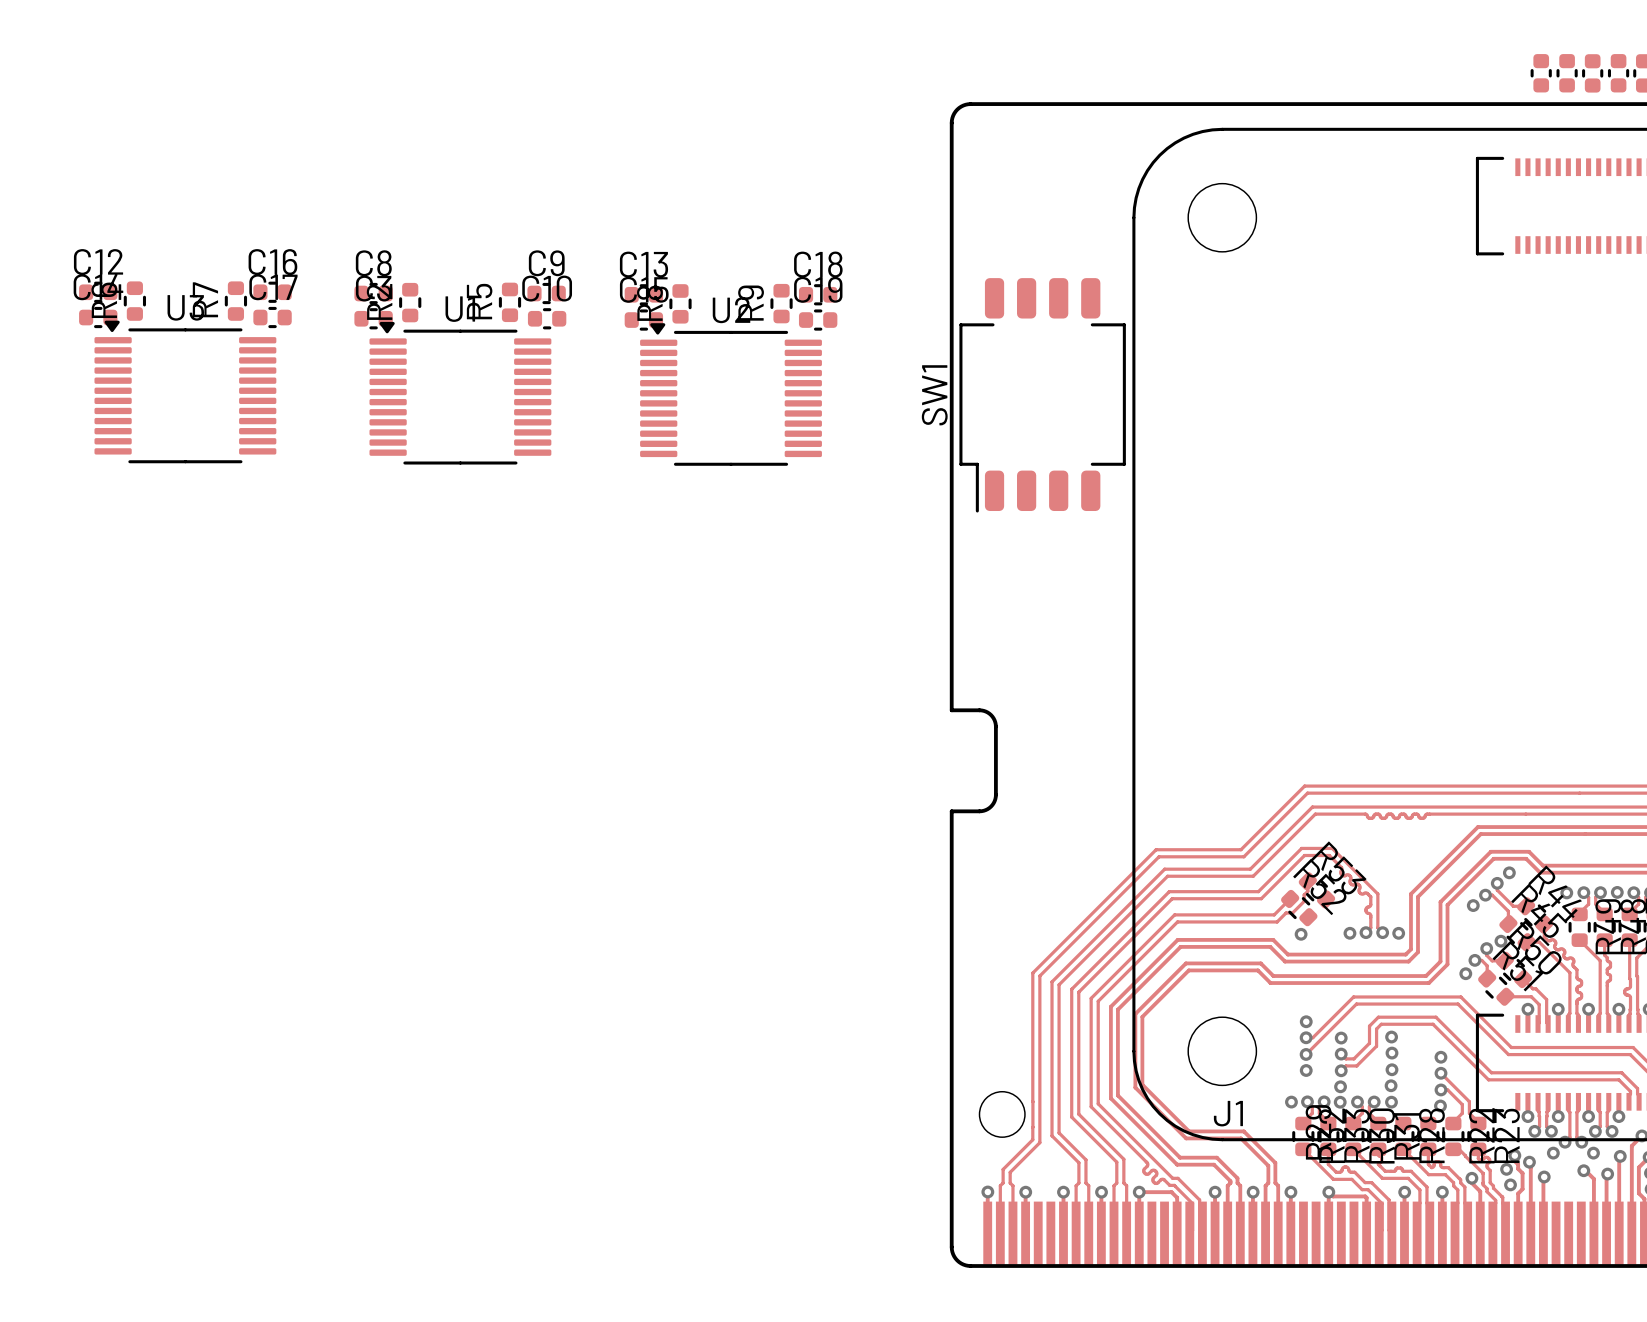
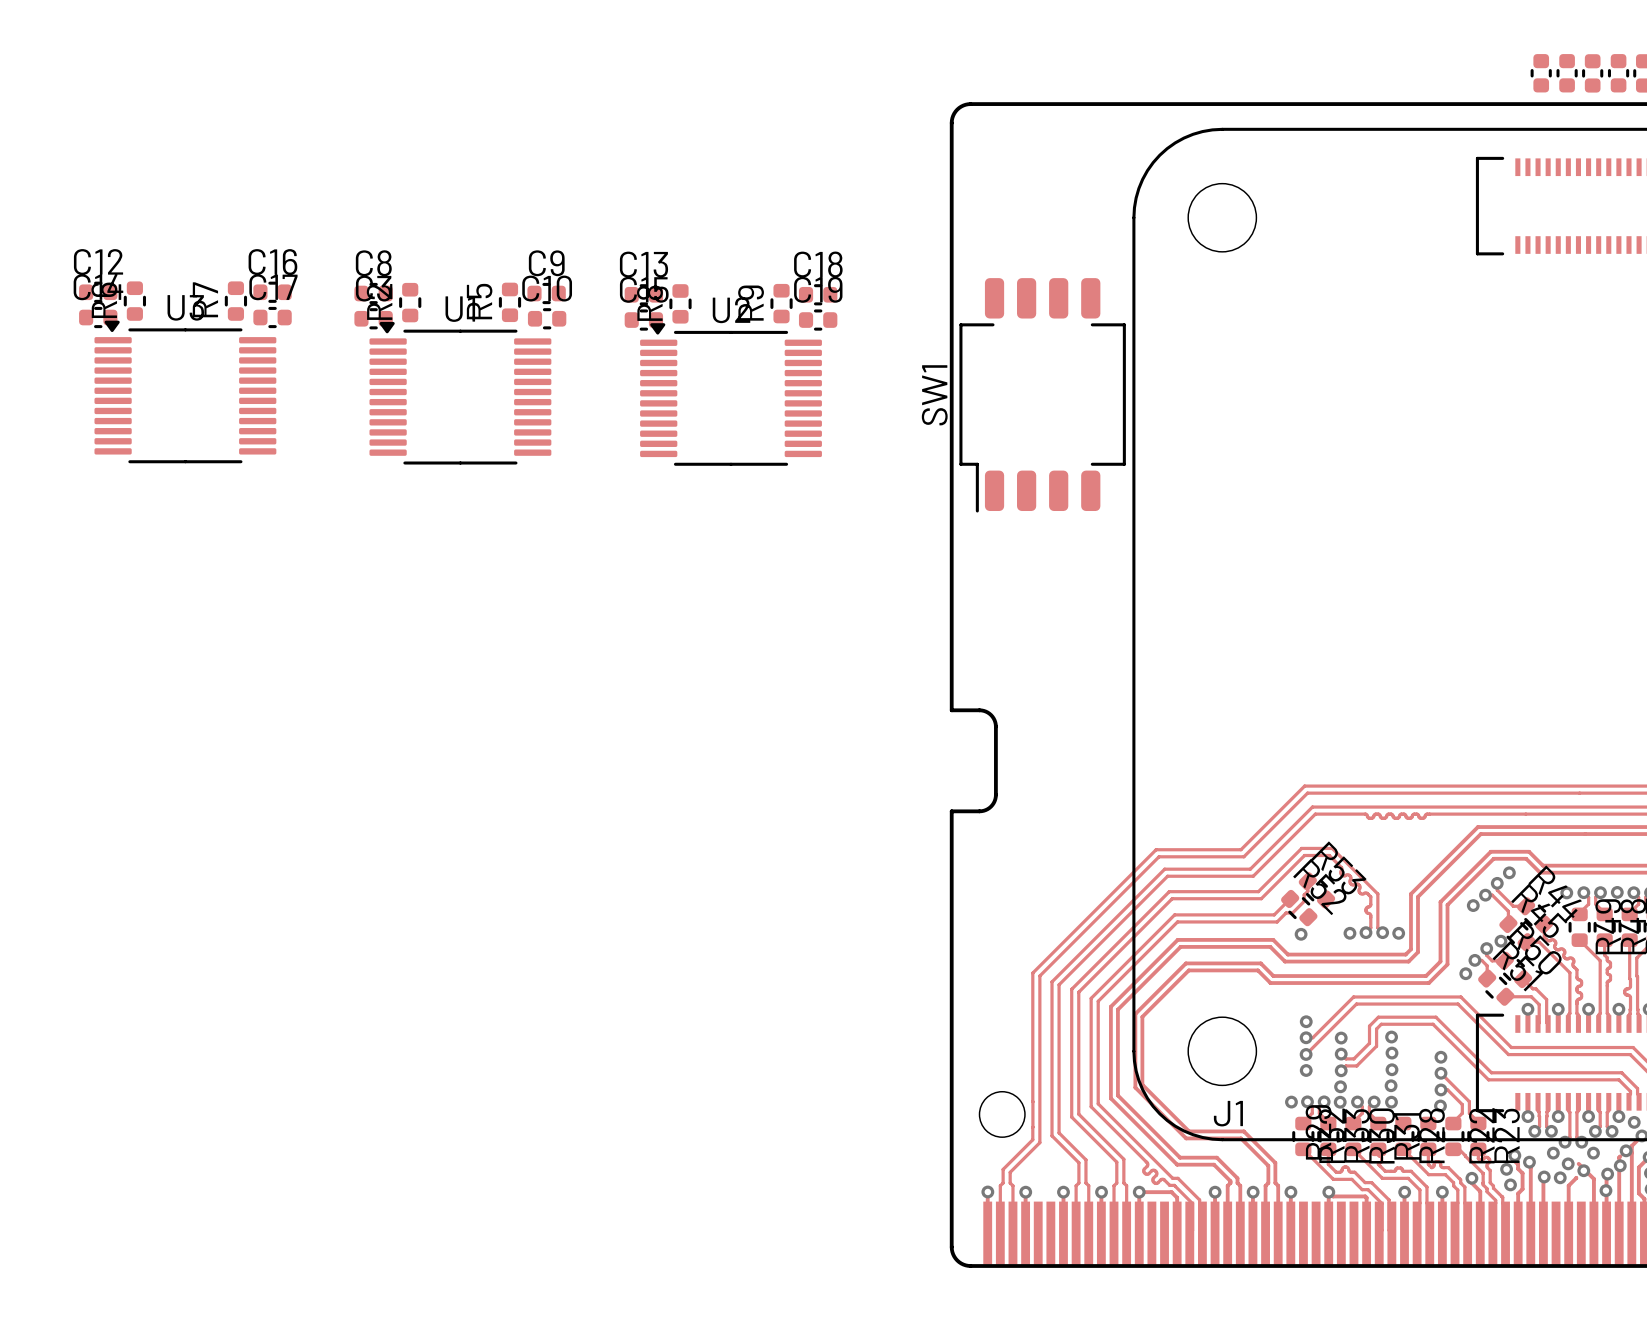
via: none -> (1634, 1122)
via: none -> (1626, 1150)
via: (1620, 1156) -> none
via: none -> (1568, 1163)
via: none -> (1620, 1165)
via: none -> (1560, 1177)
track: none -> (1576, 1178) (1568, 1185) (1568, 1233)
via: none -> (1605, 1190)

